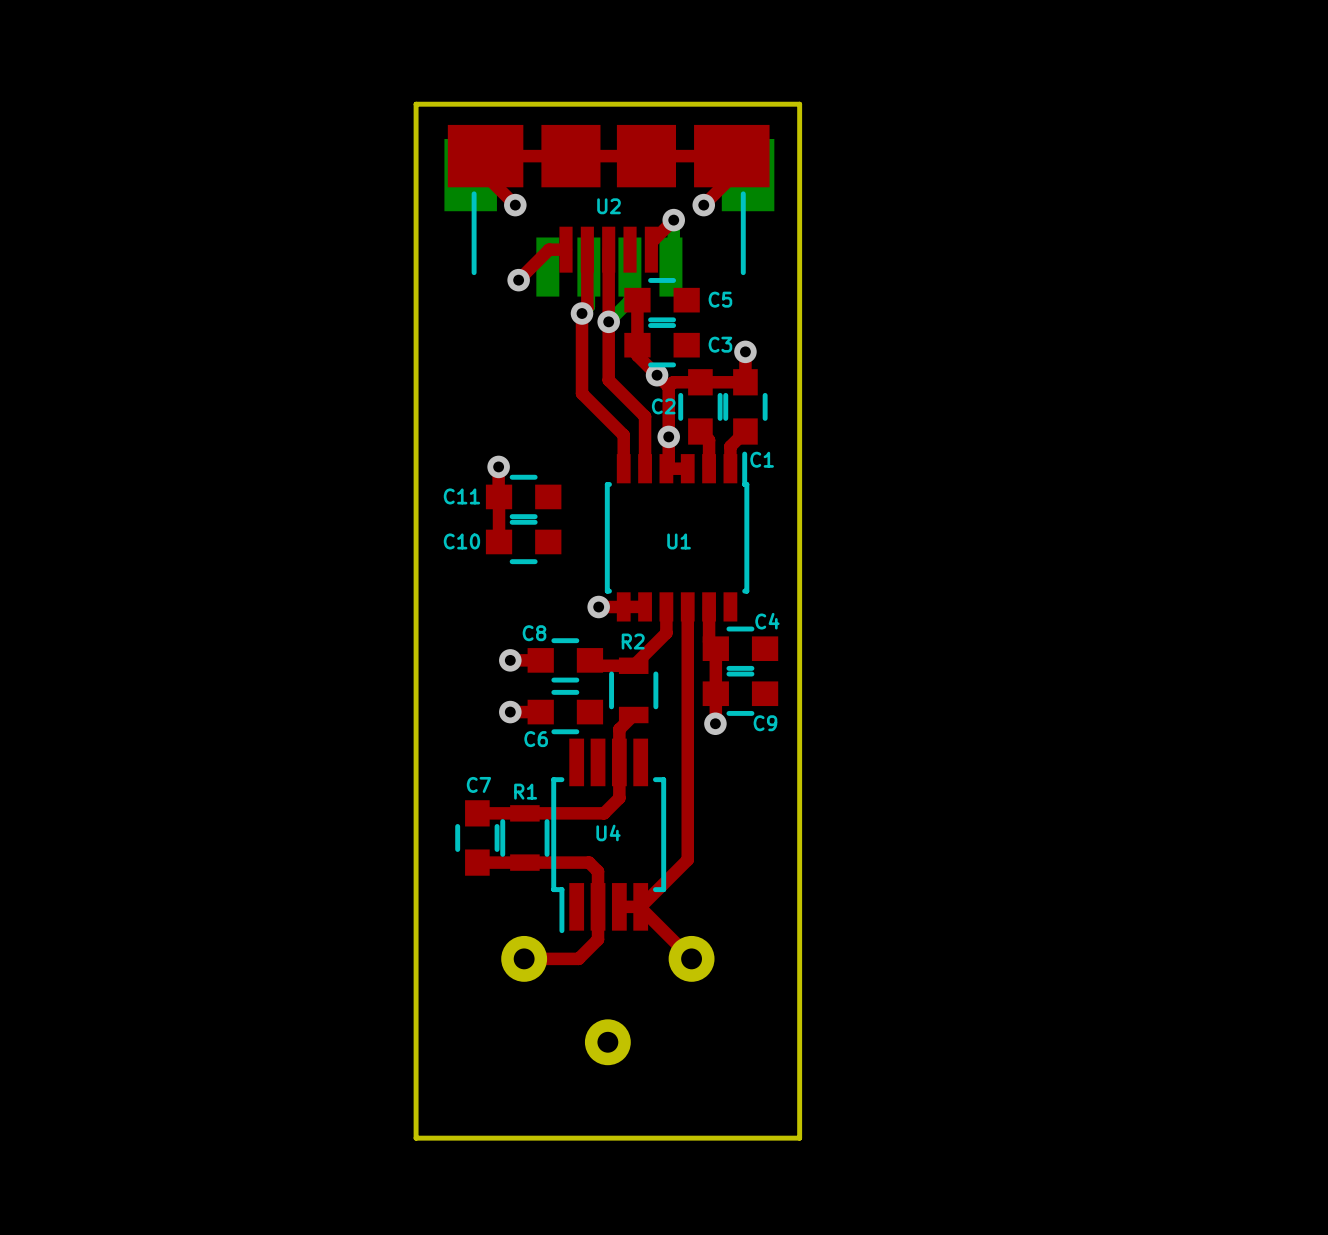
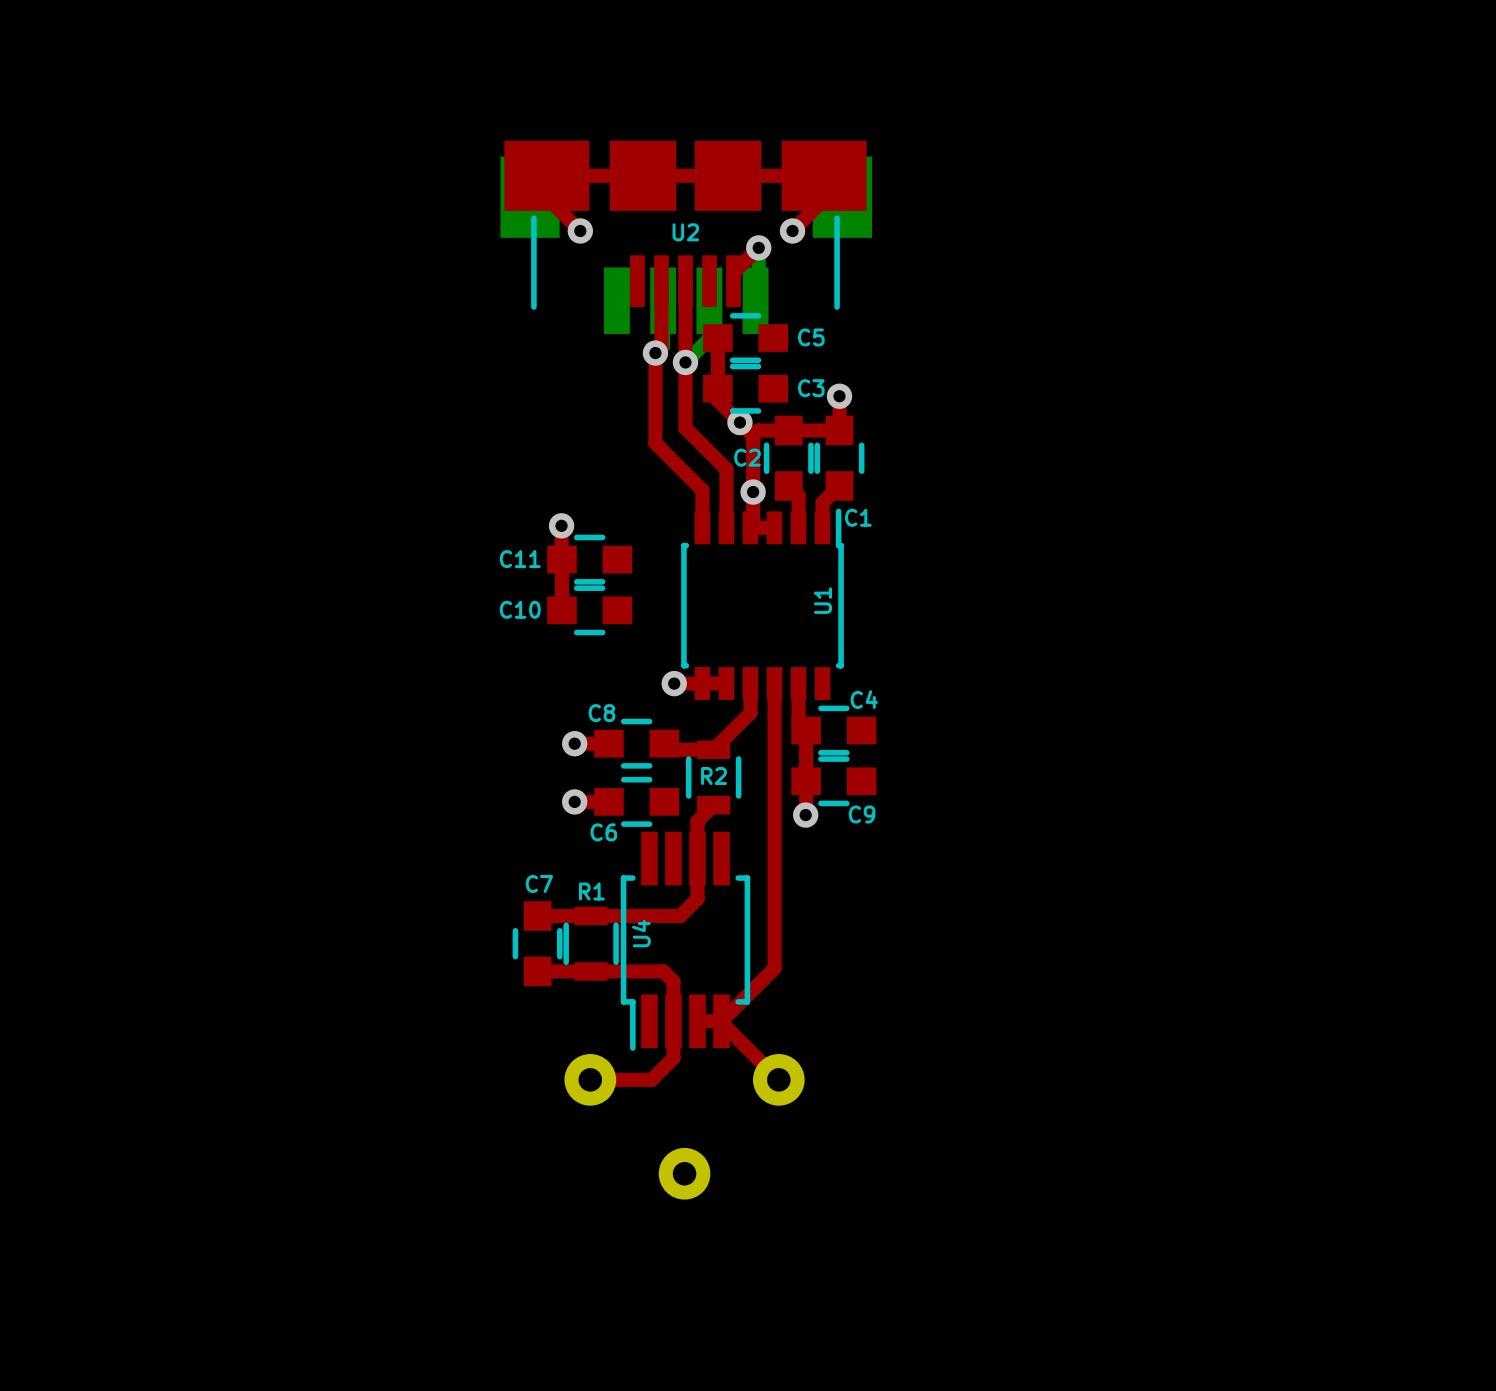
board edge: (416, 104) (416, 1138) (799, 1138) (799, 104) (416, 104) -> none
top track: (566, 249) (549, 249) (518, 280) -> none
via: (518, 280) -> none
U1 name rotation: 0° (679, 541) -> 90° counterclockwise (822, 600)
U1 name position: U1 (679, 541) -> U1 (822, 600)
R2 name position: R2 (633, 641) -> R2 (714, 776)
U4 name rotation: 0° (608, 832) -> 90° counterclockwise (641, 933)
U4 name position: U4 (608, 832) -> U4 (641, 933)

